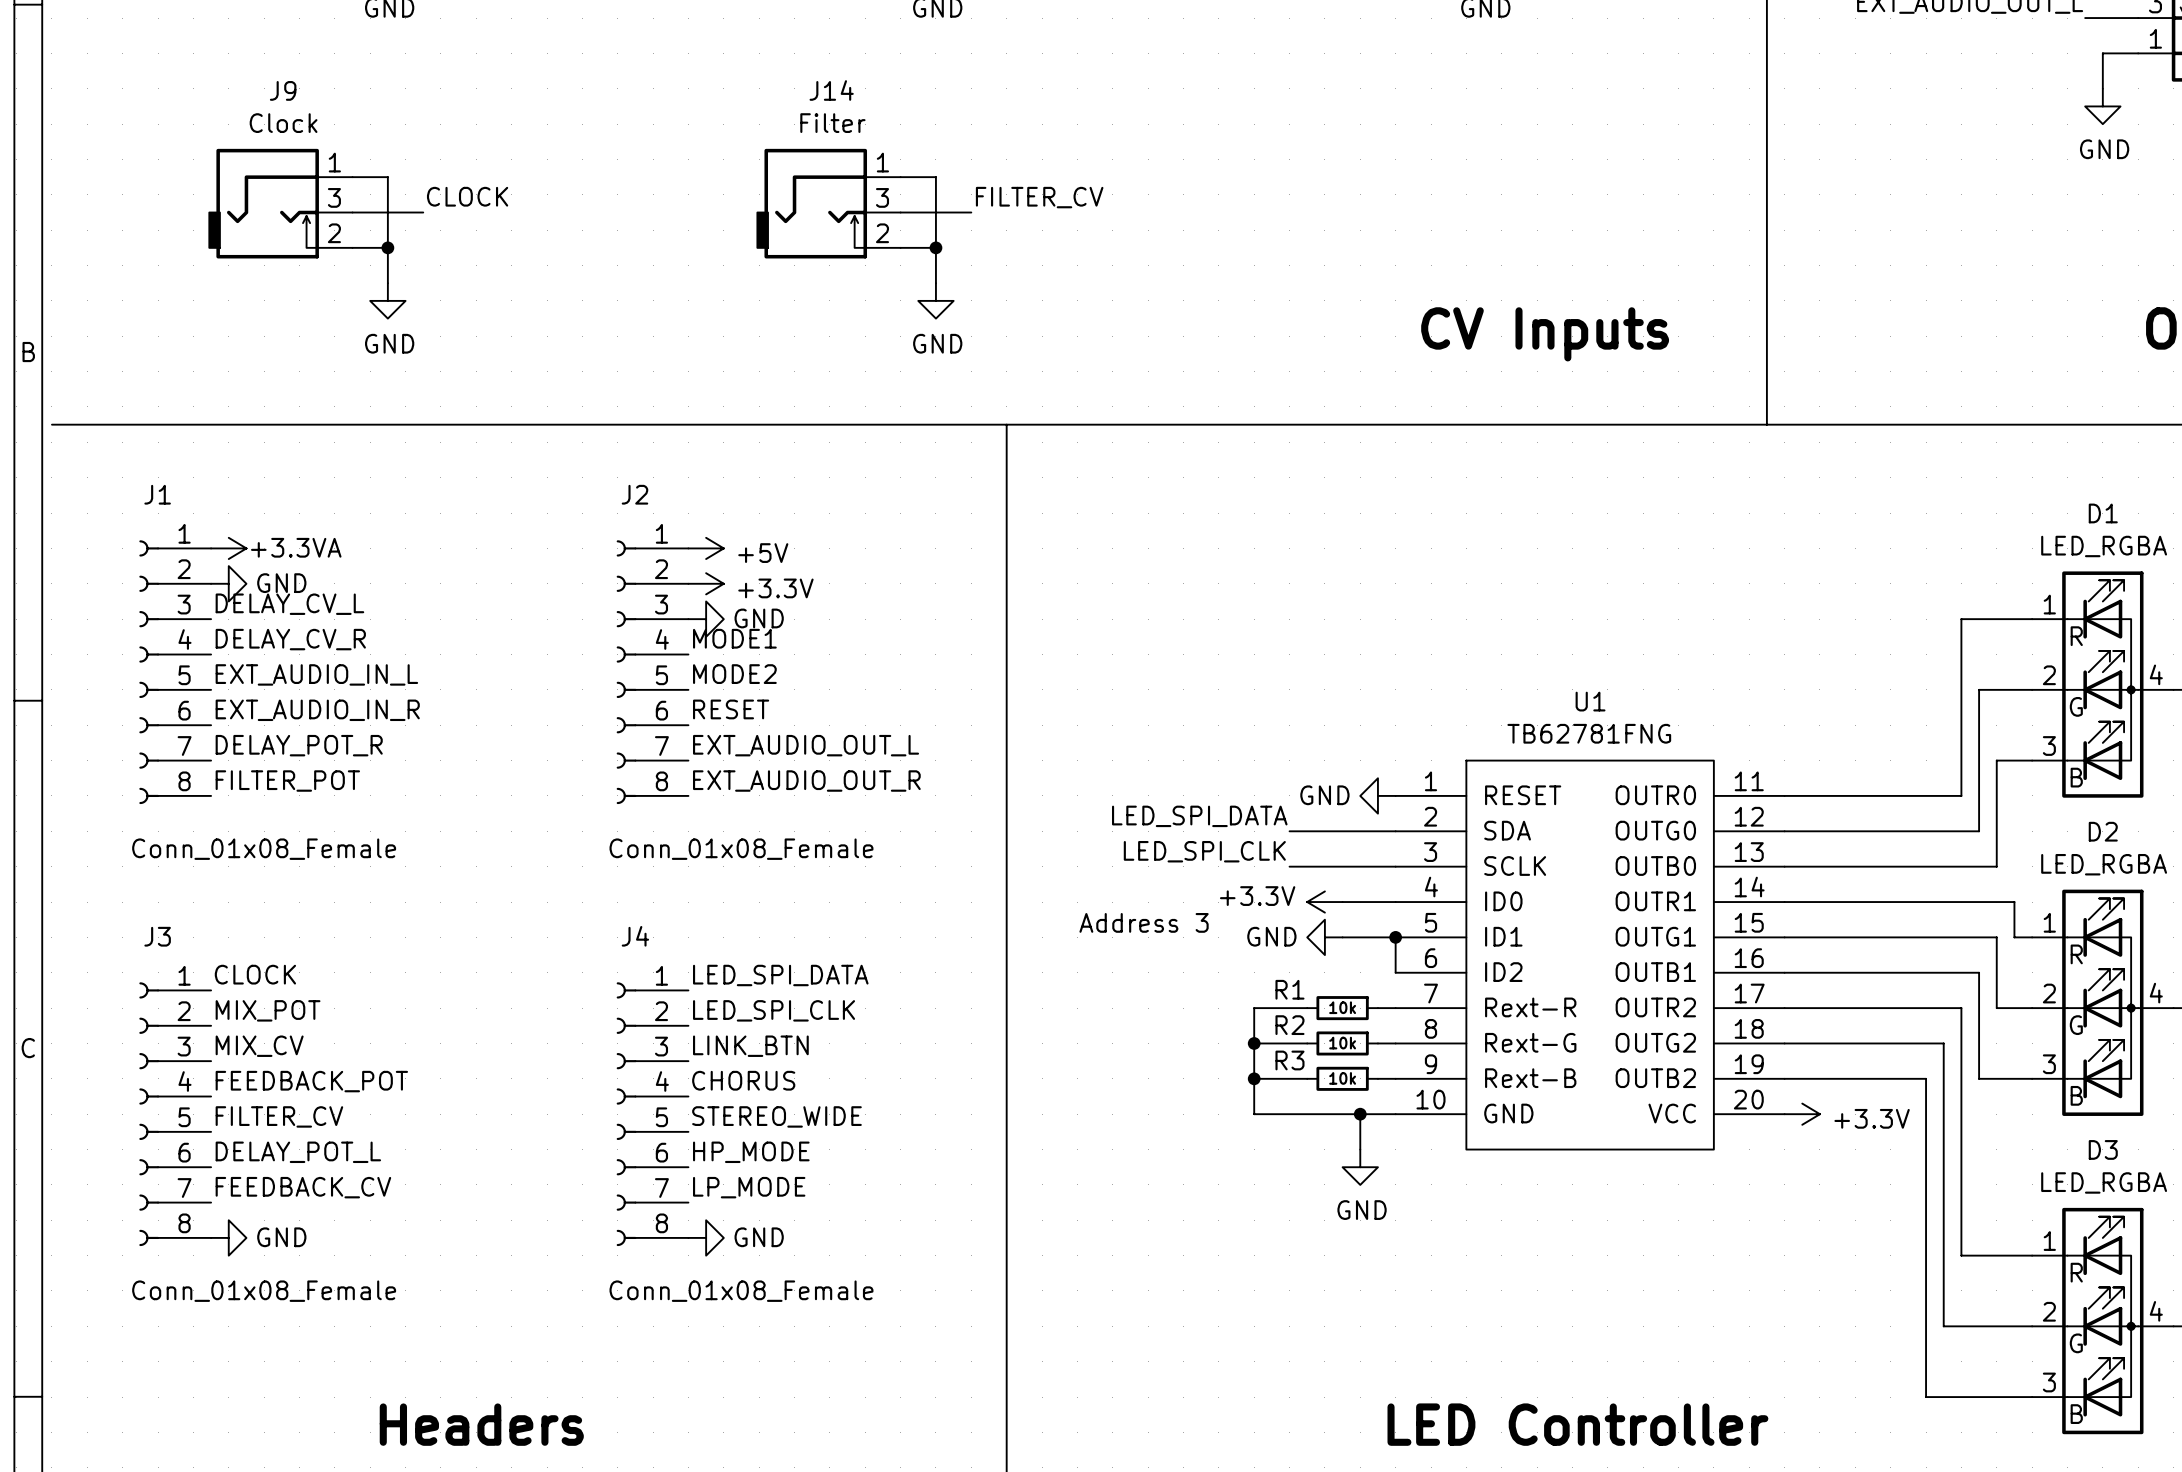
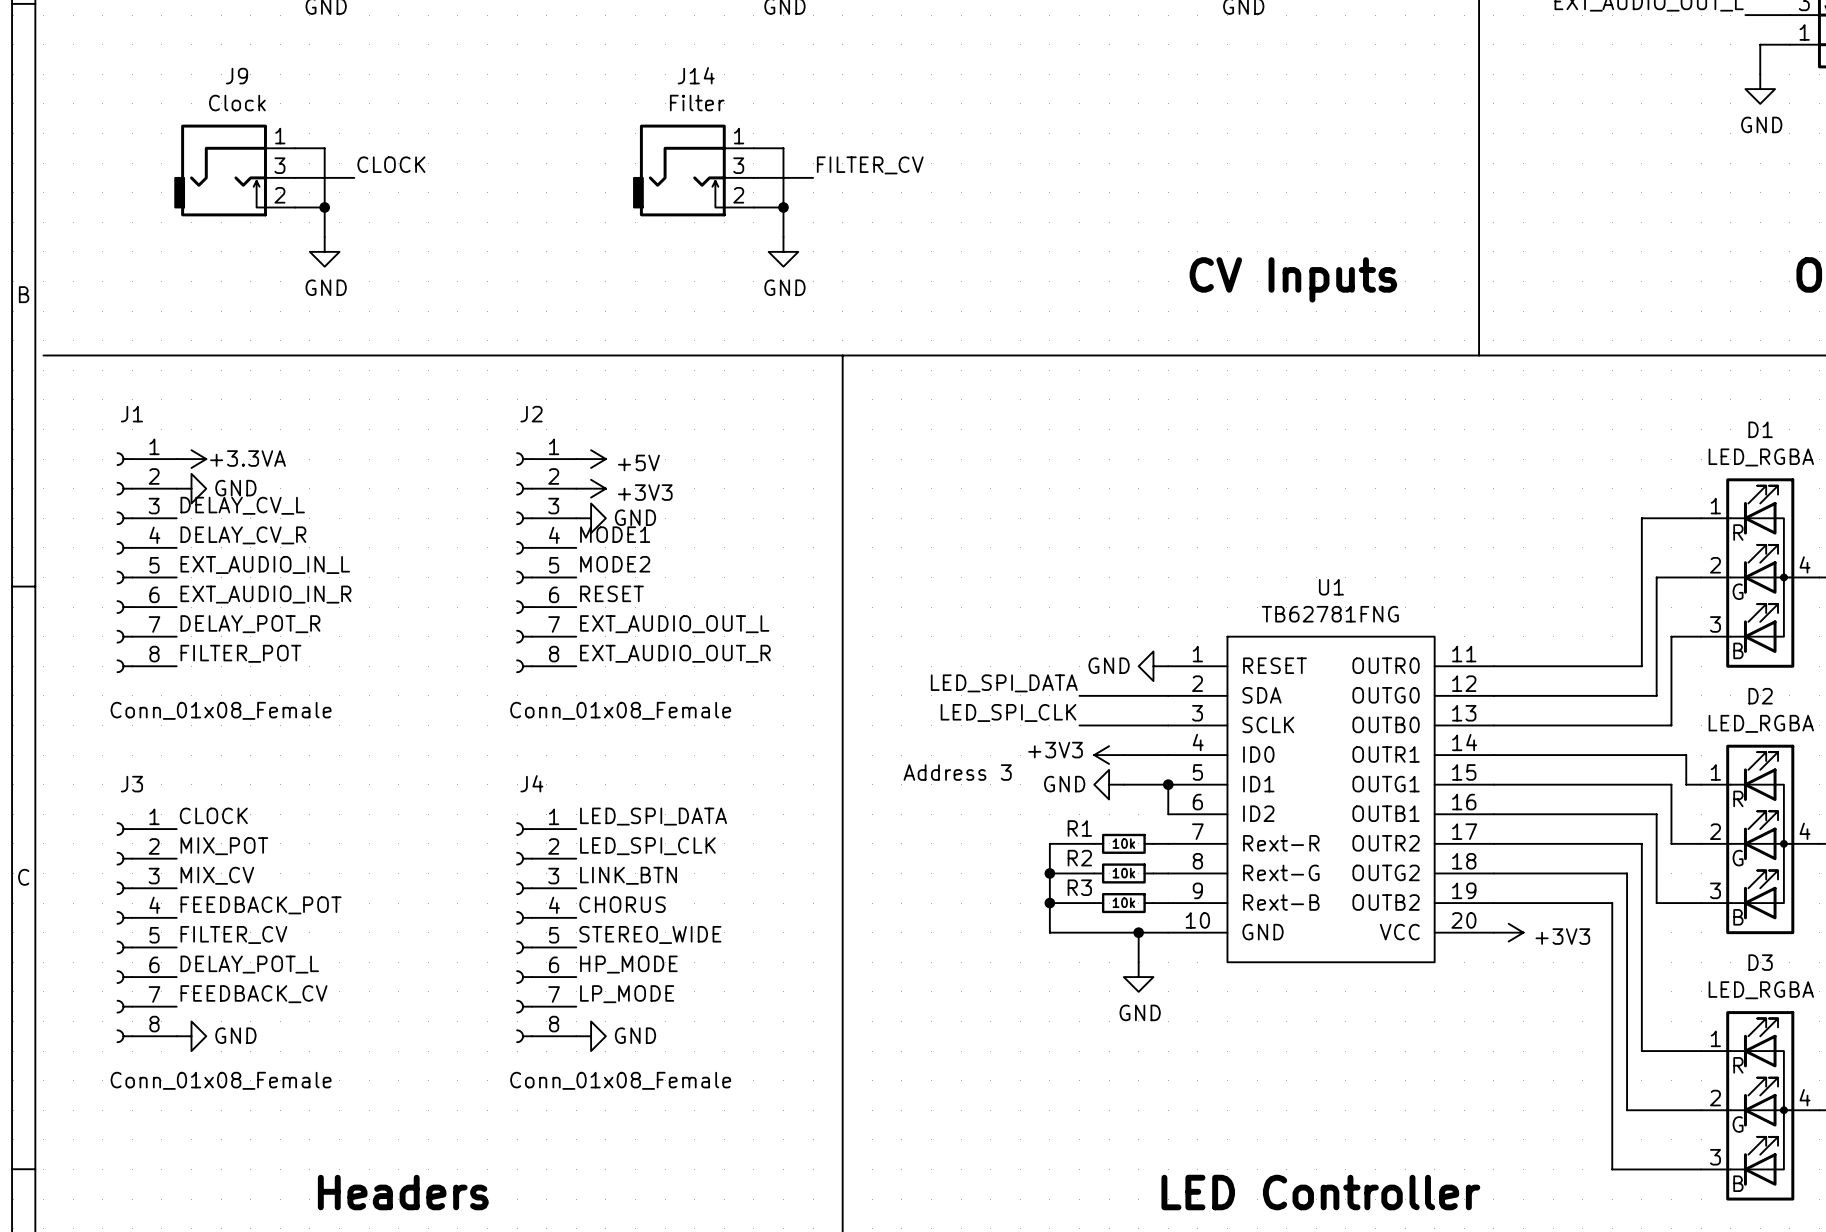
power symbol: +3.3V (706, 583) -> +3V3 (591, 488)
power symbol: +3.3V (1324, 902) -> +3V3 (1109, 755)
power symbol: +3.3V (1802, 1114) -> +3V3 (1508, 932)

